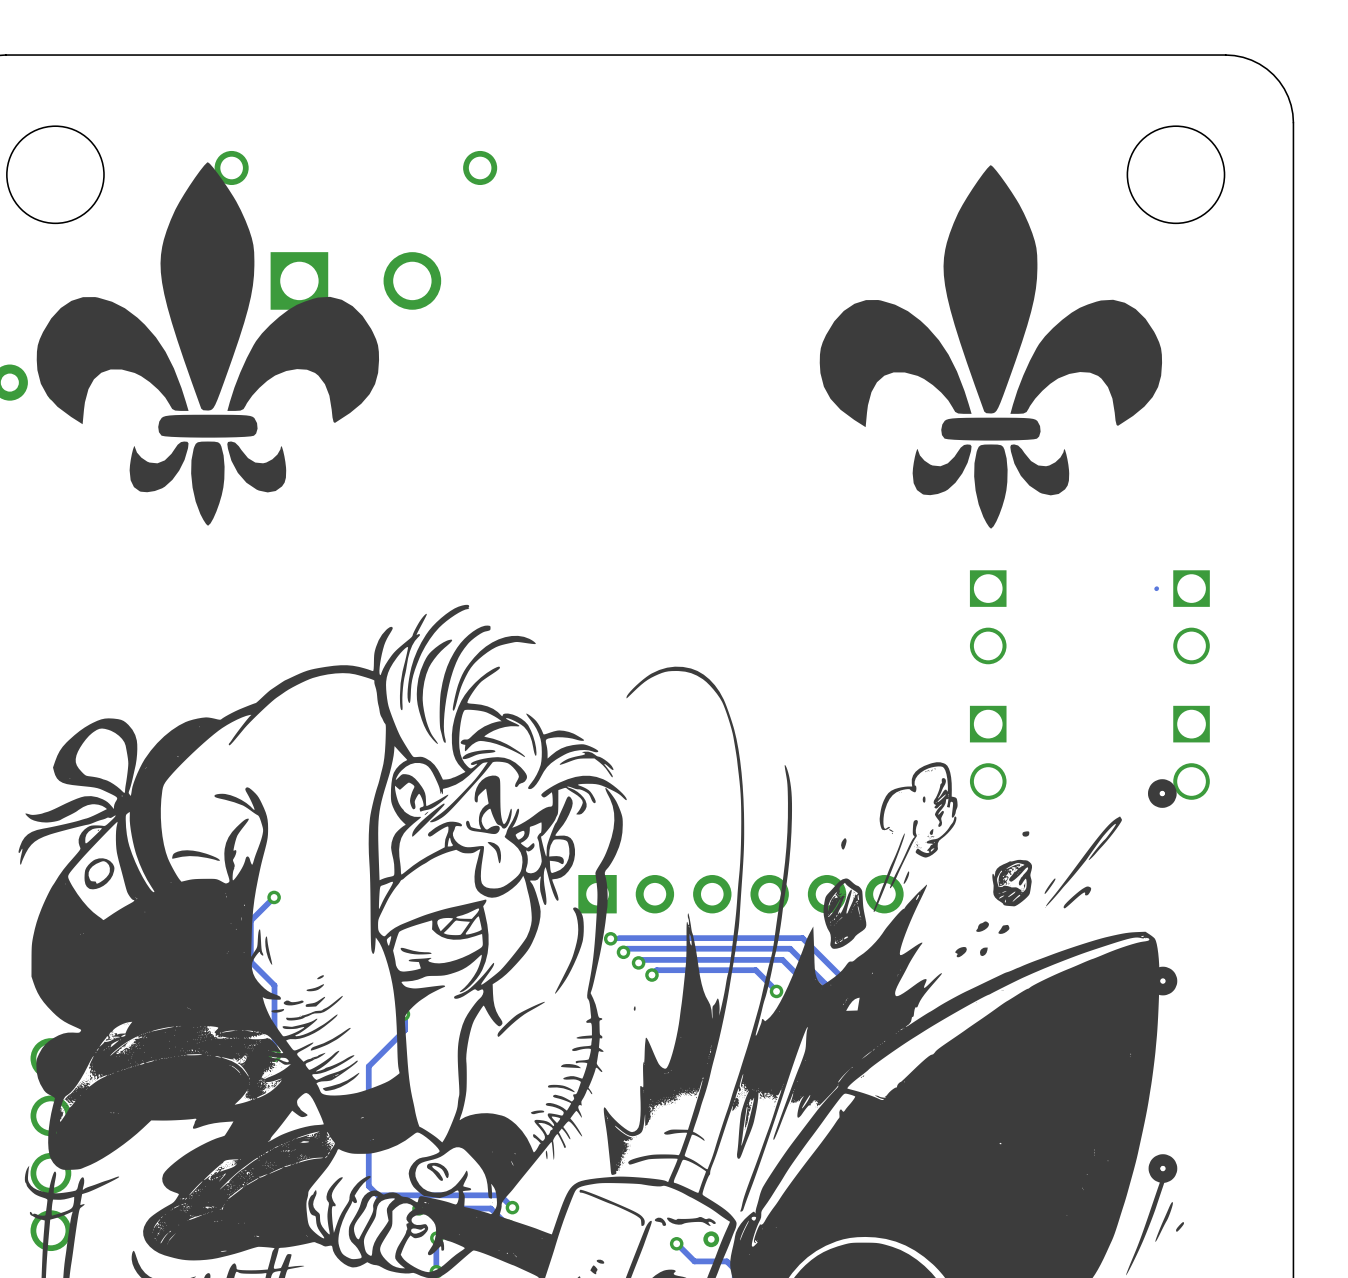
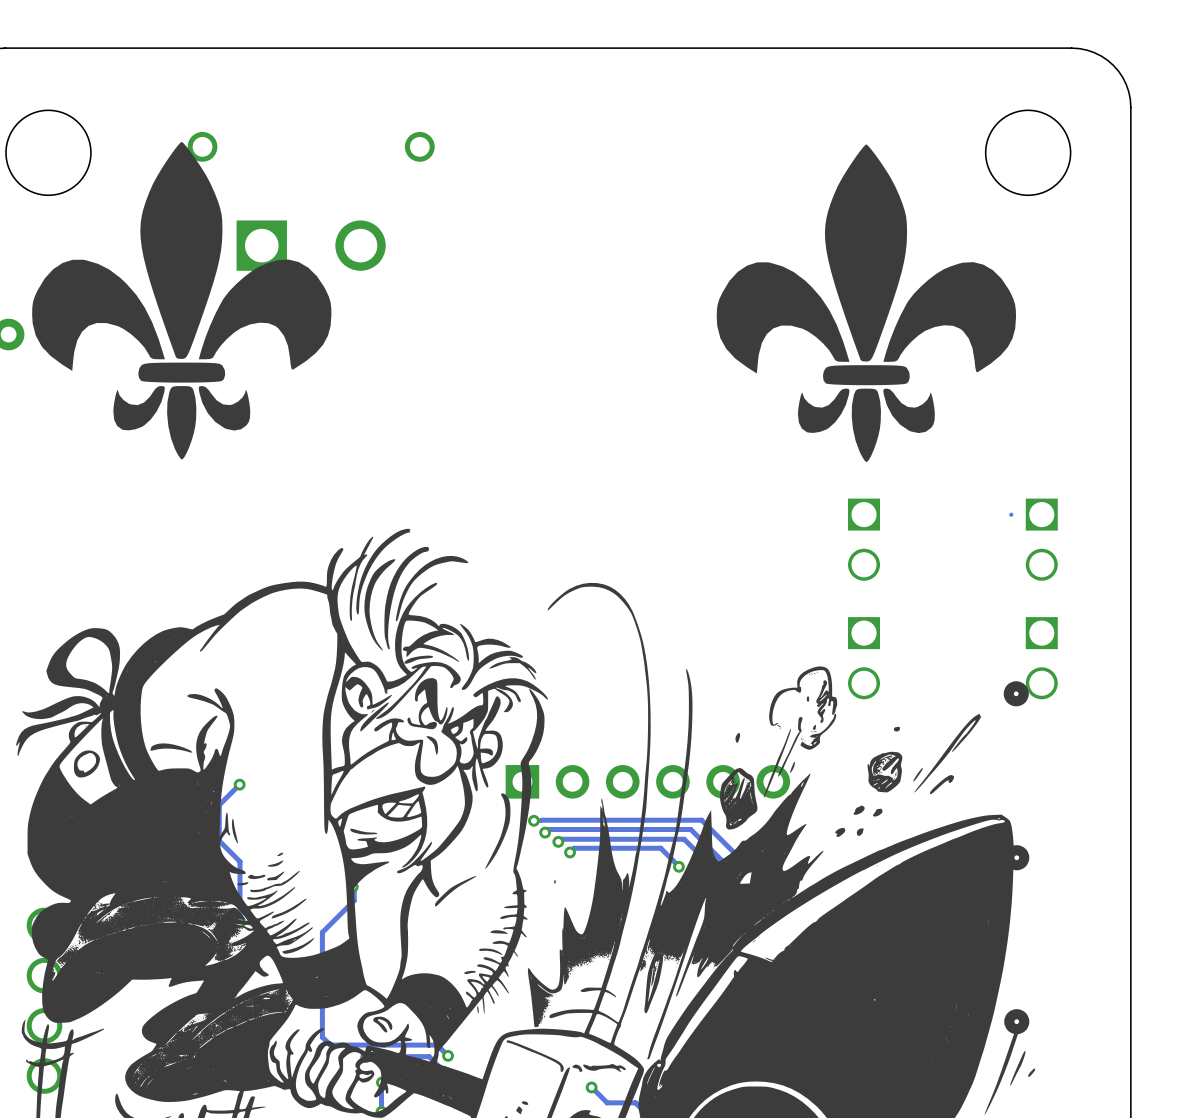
via: (711, 1239) -> none

